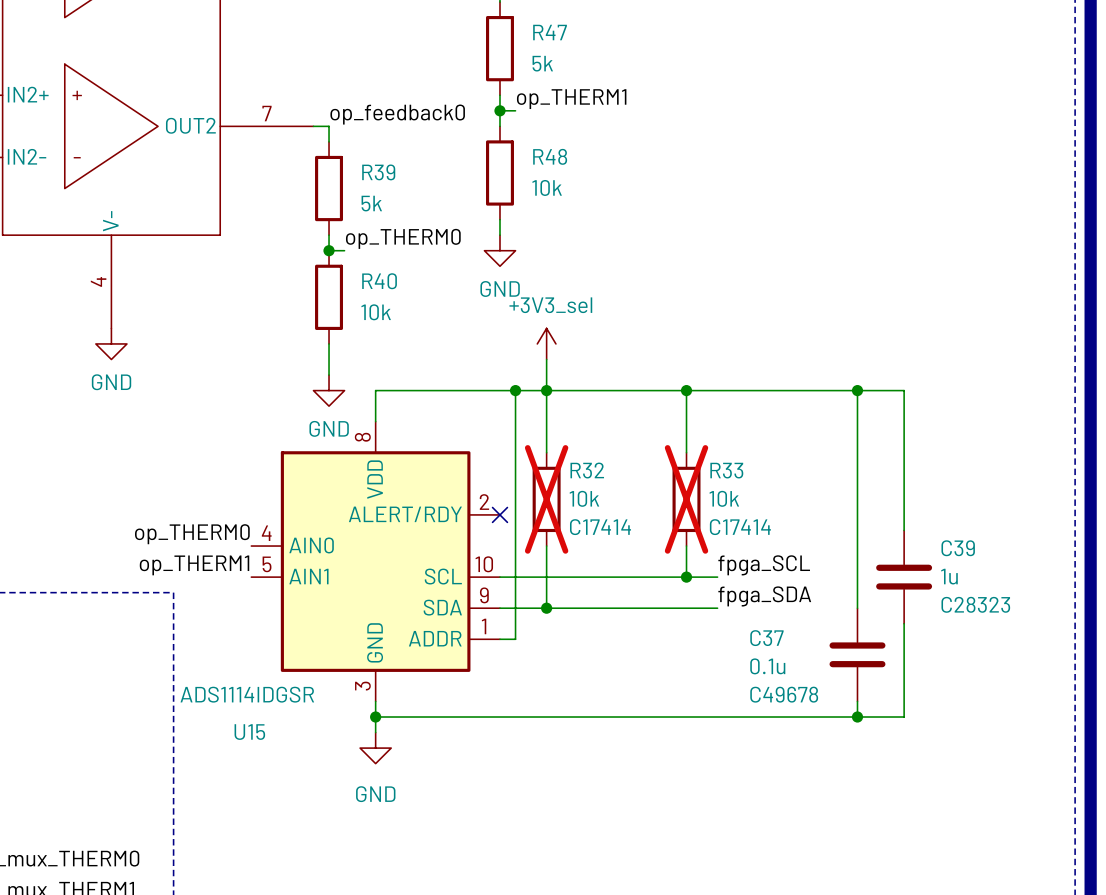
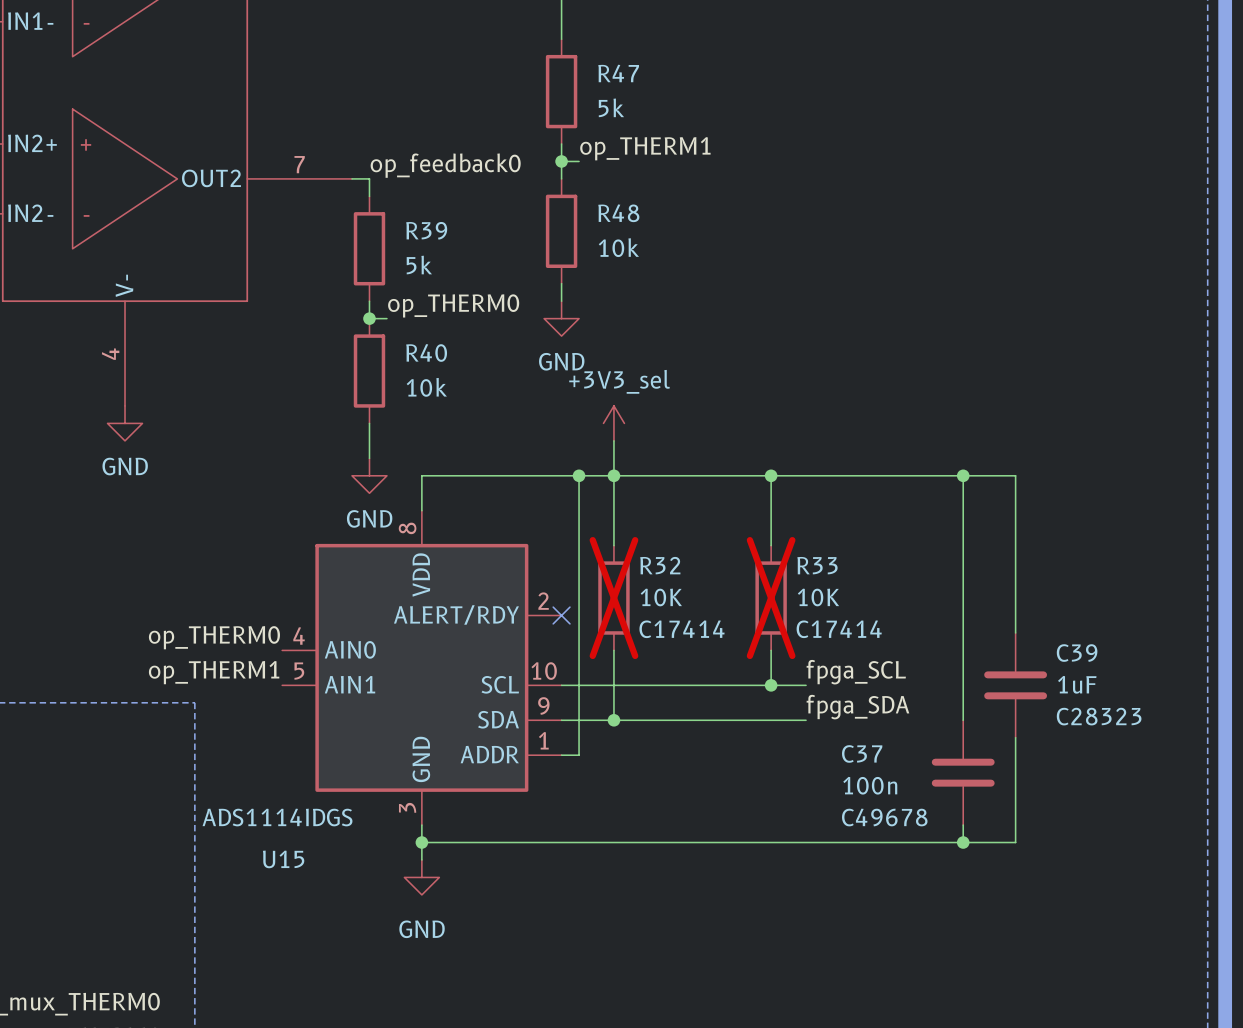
R32 value: 10k (584, 498) -> 10K (661, 597)
R33 value: 10k (724, 498) -> 10K (818, 597)
C39 value: 1u (949, 576) -> 1uF (1077, 684)
C37 value: 0.1u (767, 666) -> 100n (870, 785)
U15 value: ADS1114IDGSR (247, 694) -> ADS1114IDGS (277, 817)

